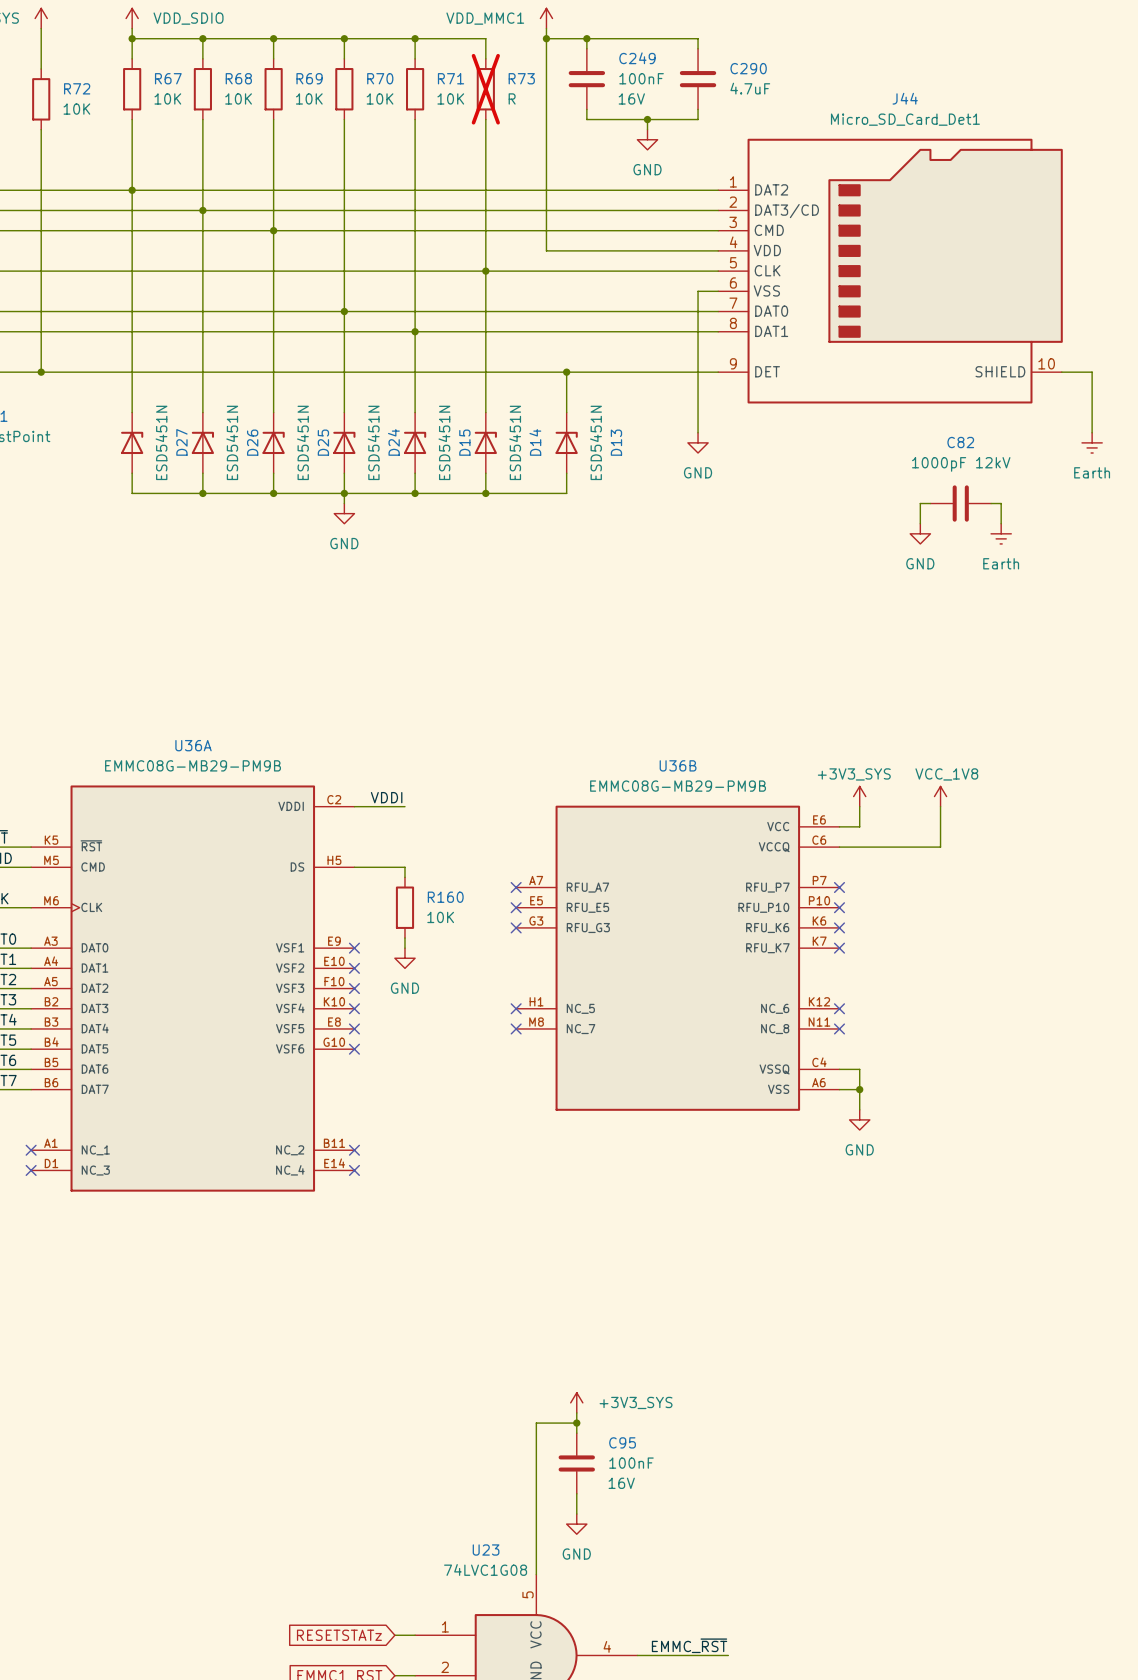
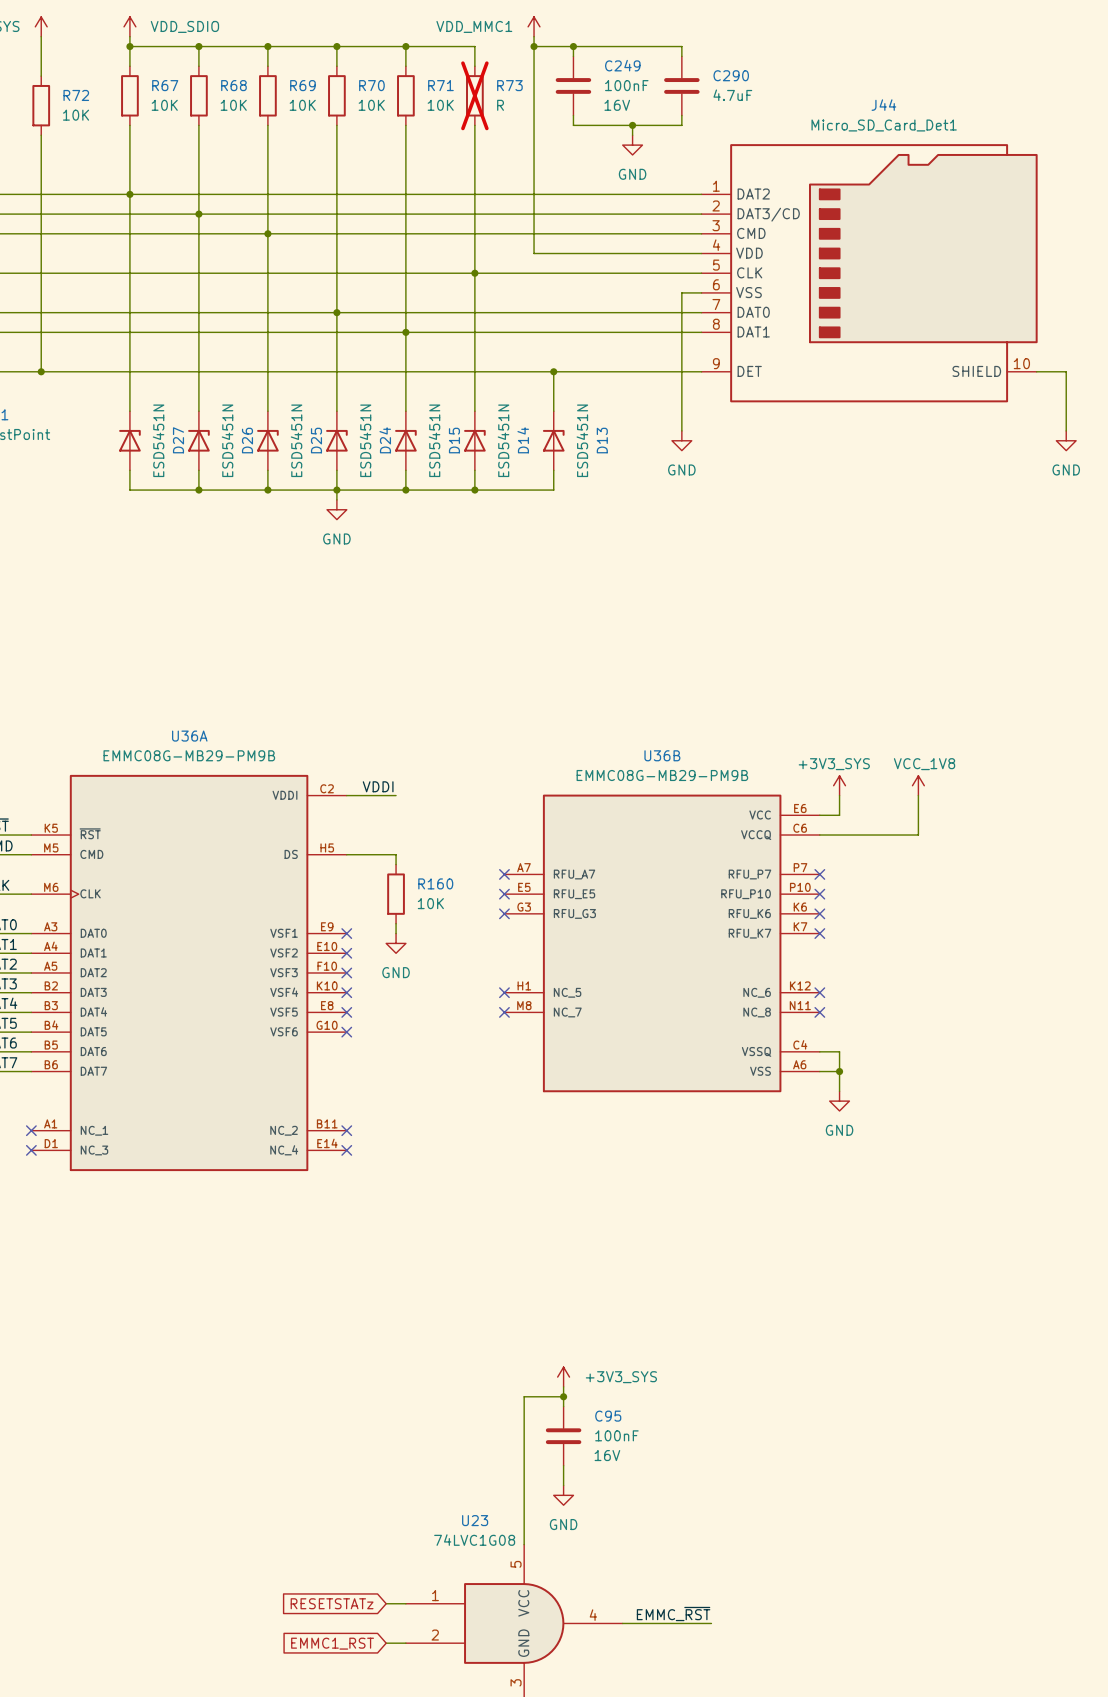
power symbol: Earth (1092, 442) -> GND (1066, 440)
wire: (930, 503) (920, 503) (920, 523) -> none
C82: 1000pF 12kV (960, 503) -> none
wire: (991, 503) (1001, 503) (1001, 523) -> none
power symbol: GND (920, 533) -> none
power symbol: Earth (1001, 533) -> none

